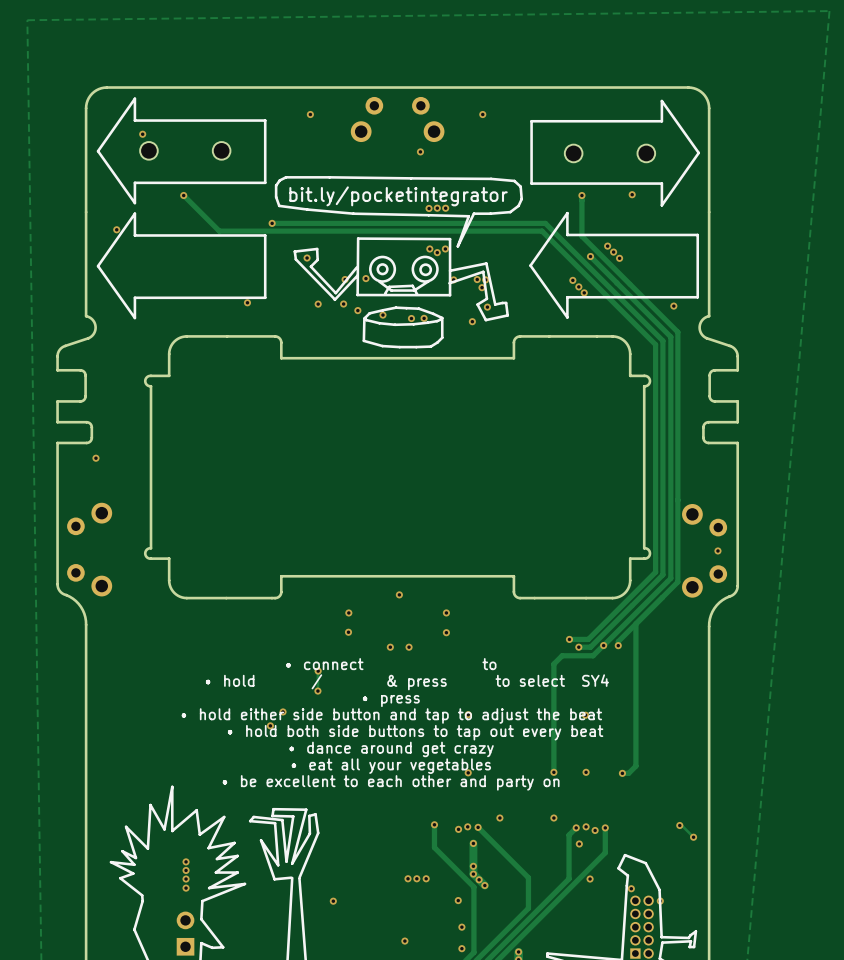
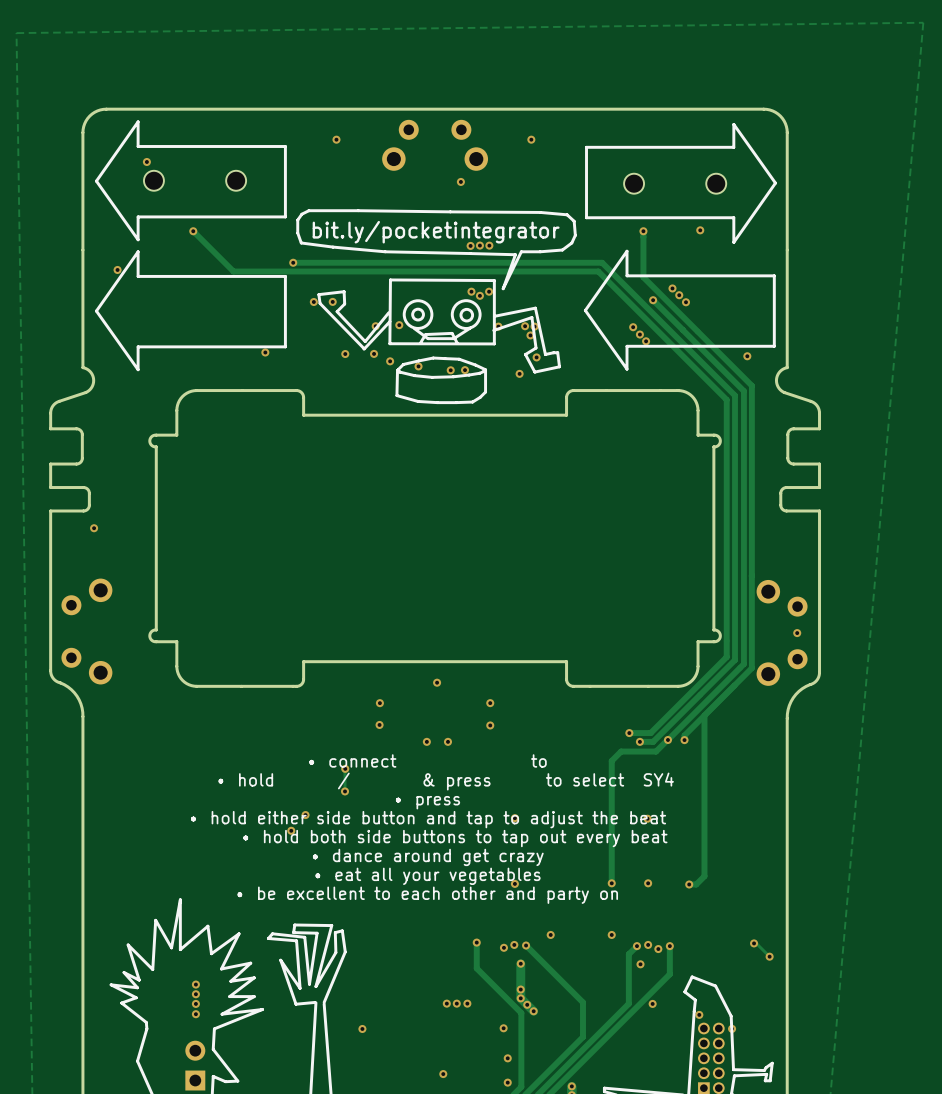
via: none -> (313, 302)

